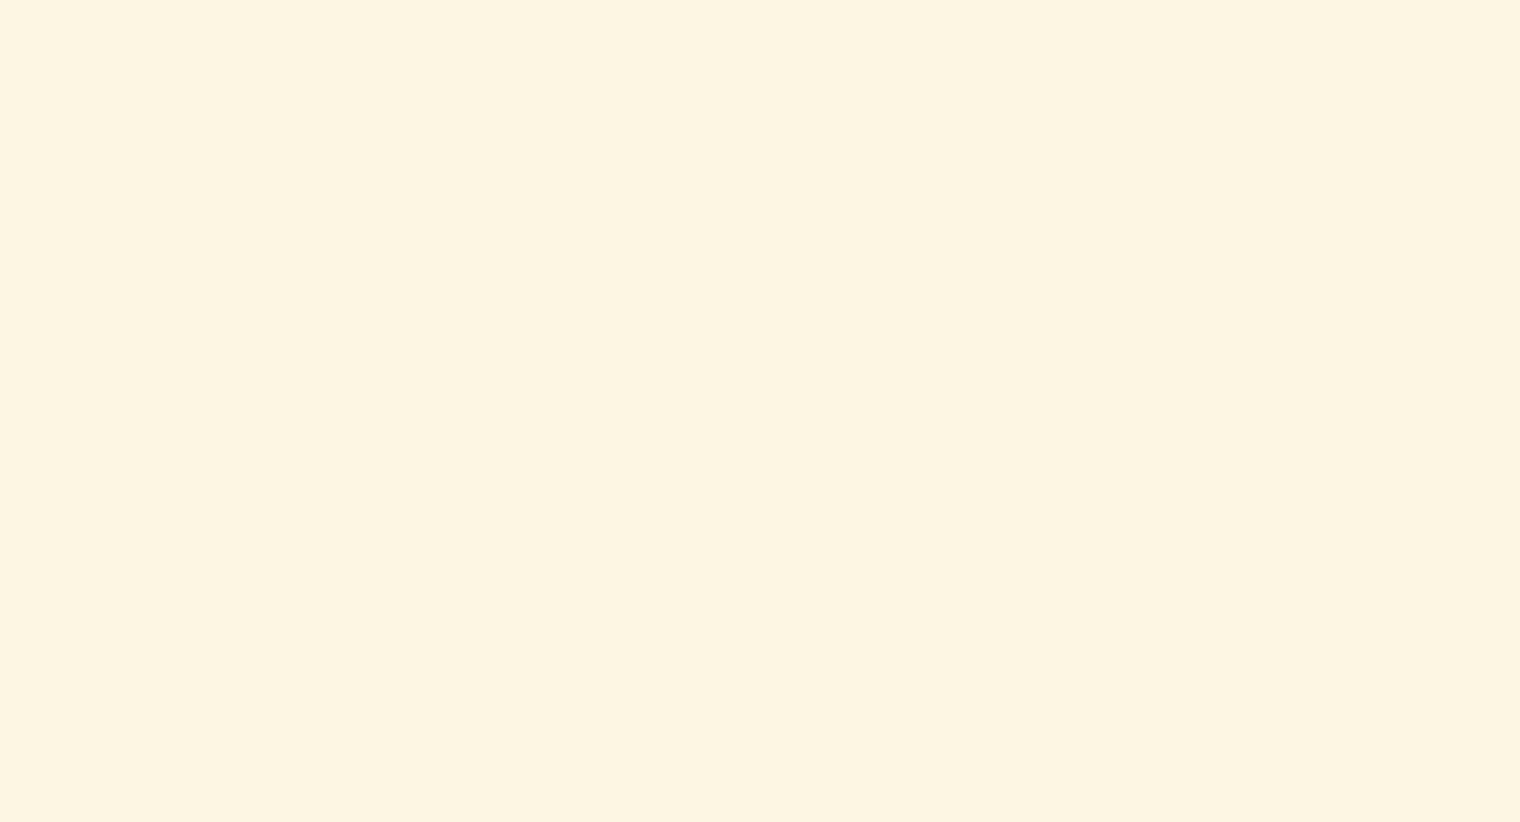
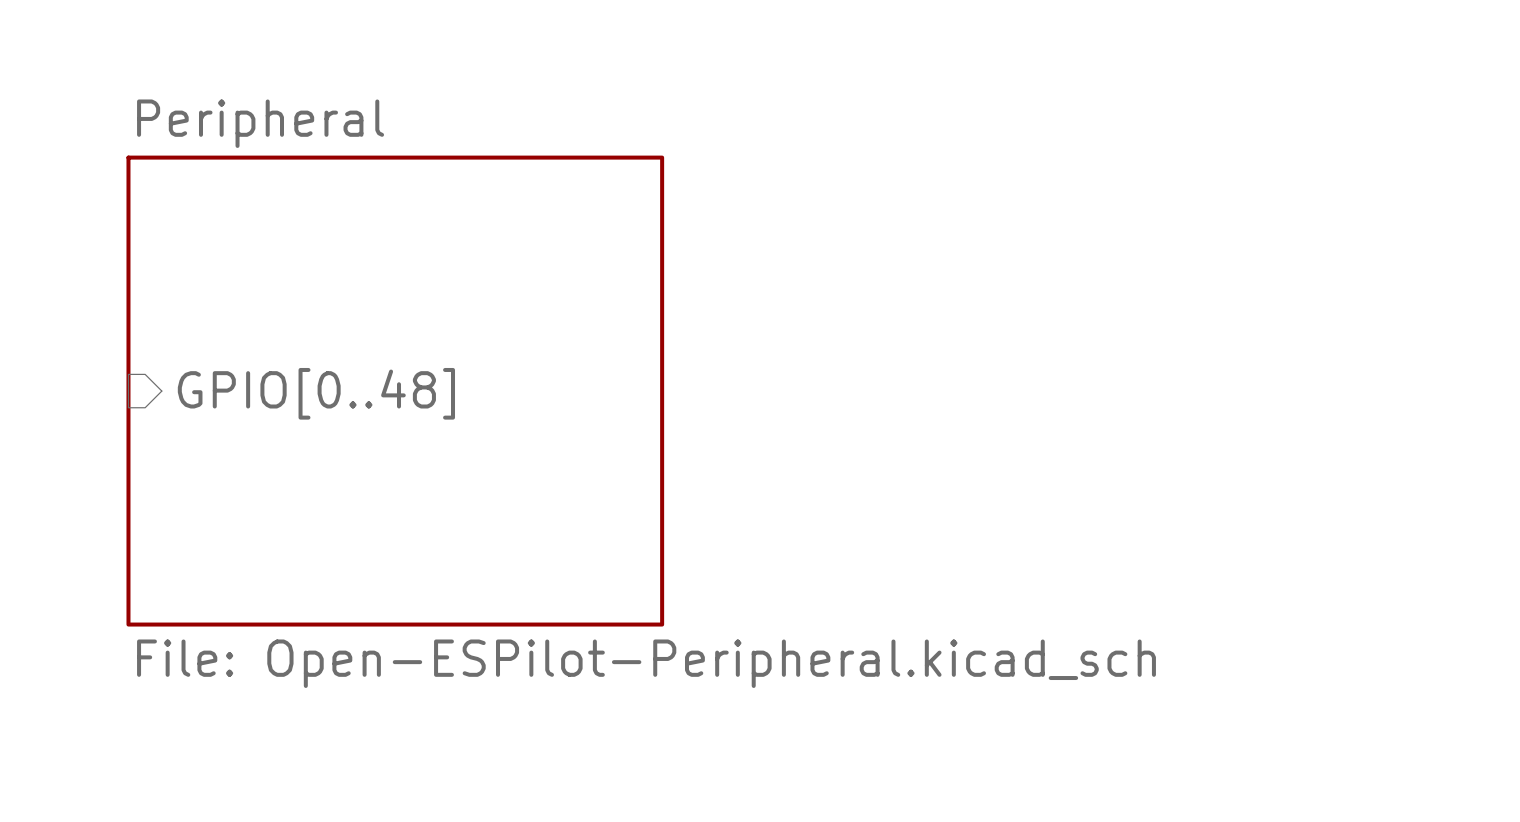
sheet Peripheral: none -> File: Open-ESPilot-Peripheral.kicad_sch (395, 391)
sheet pin: none -> GPIO[0..48] (316, 393)

